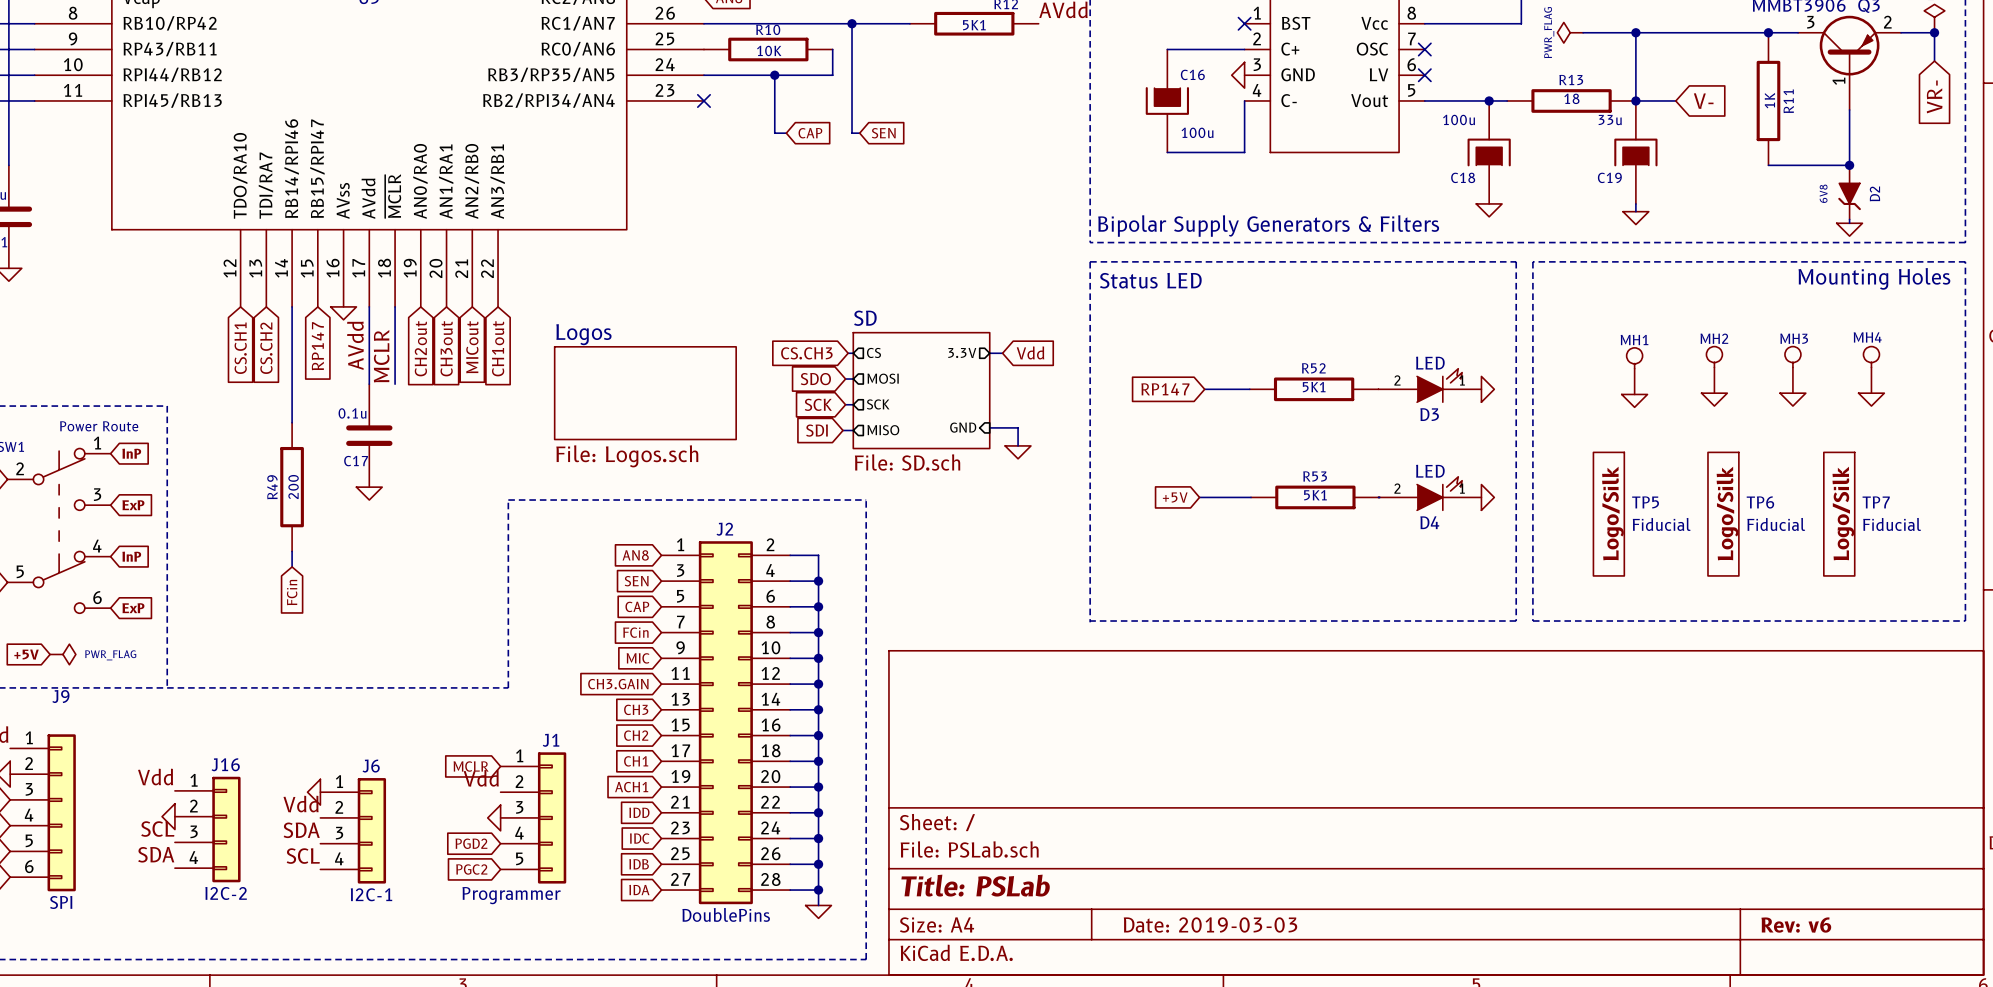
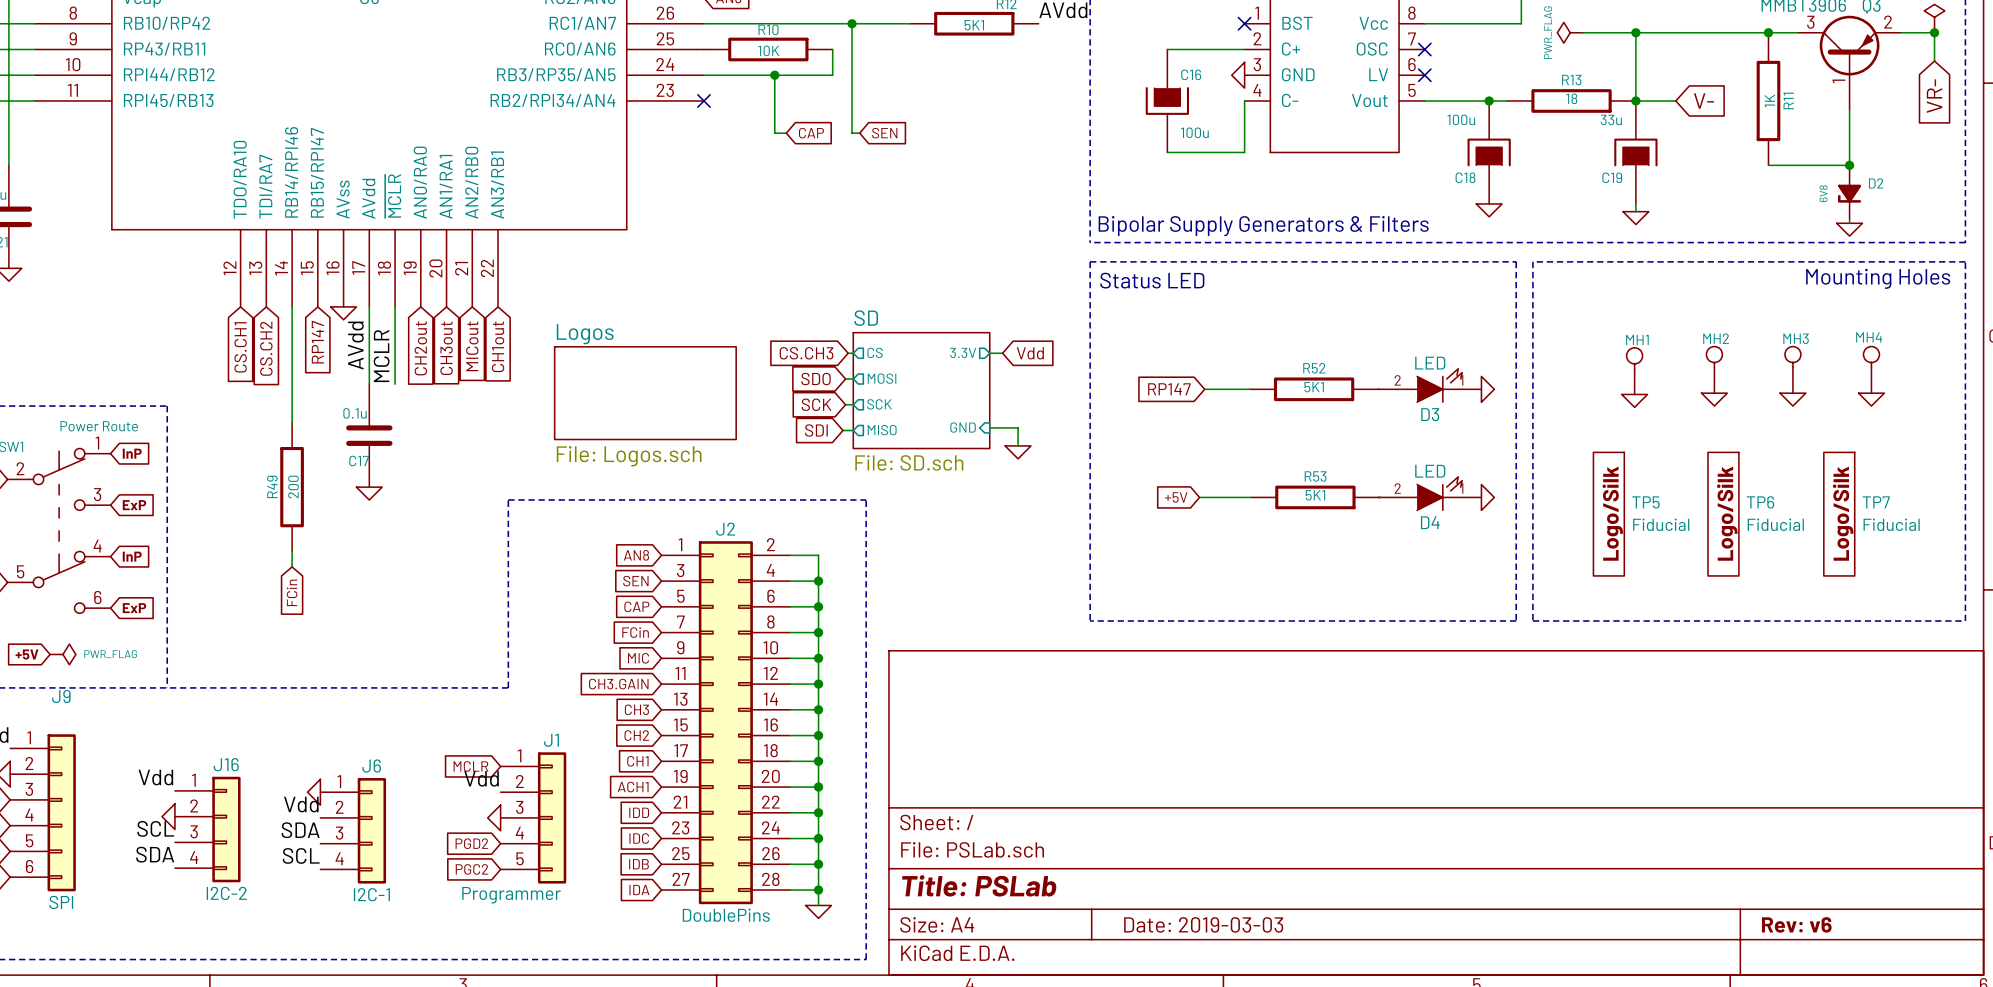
D2 symbol: [1838, 167, 1861, 220] -> [1837, 167, 1862, 220]
D2 name rotation: 0° (1874, 193) -> 90° clockwise (1876, 183)

